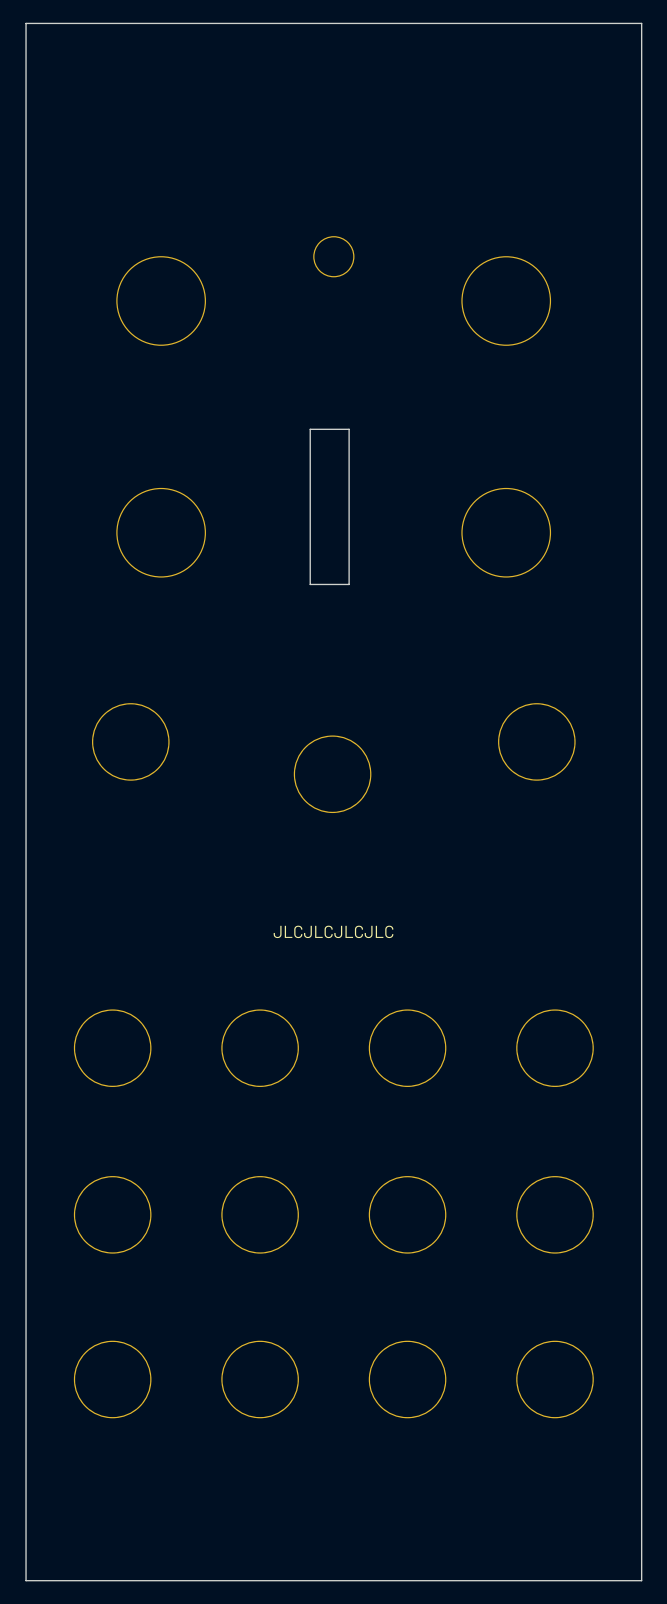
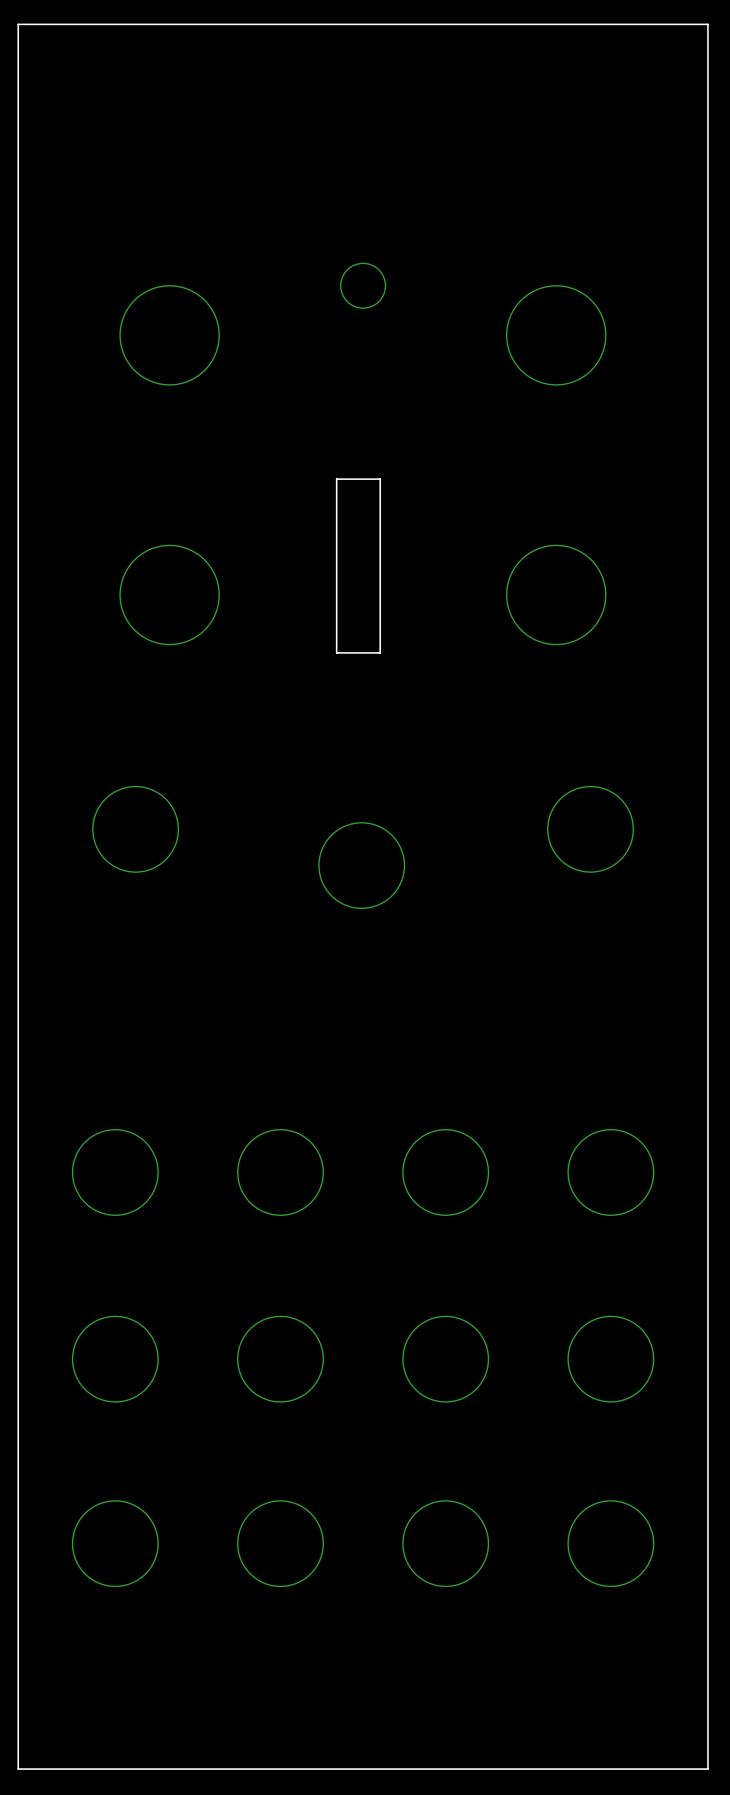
text: JLCJLCJLCJLC (333, 931) -> none

